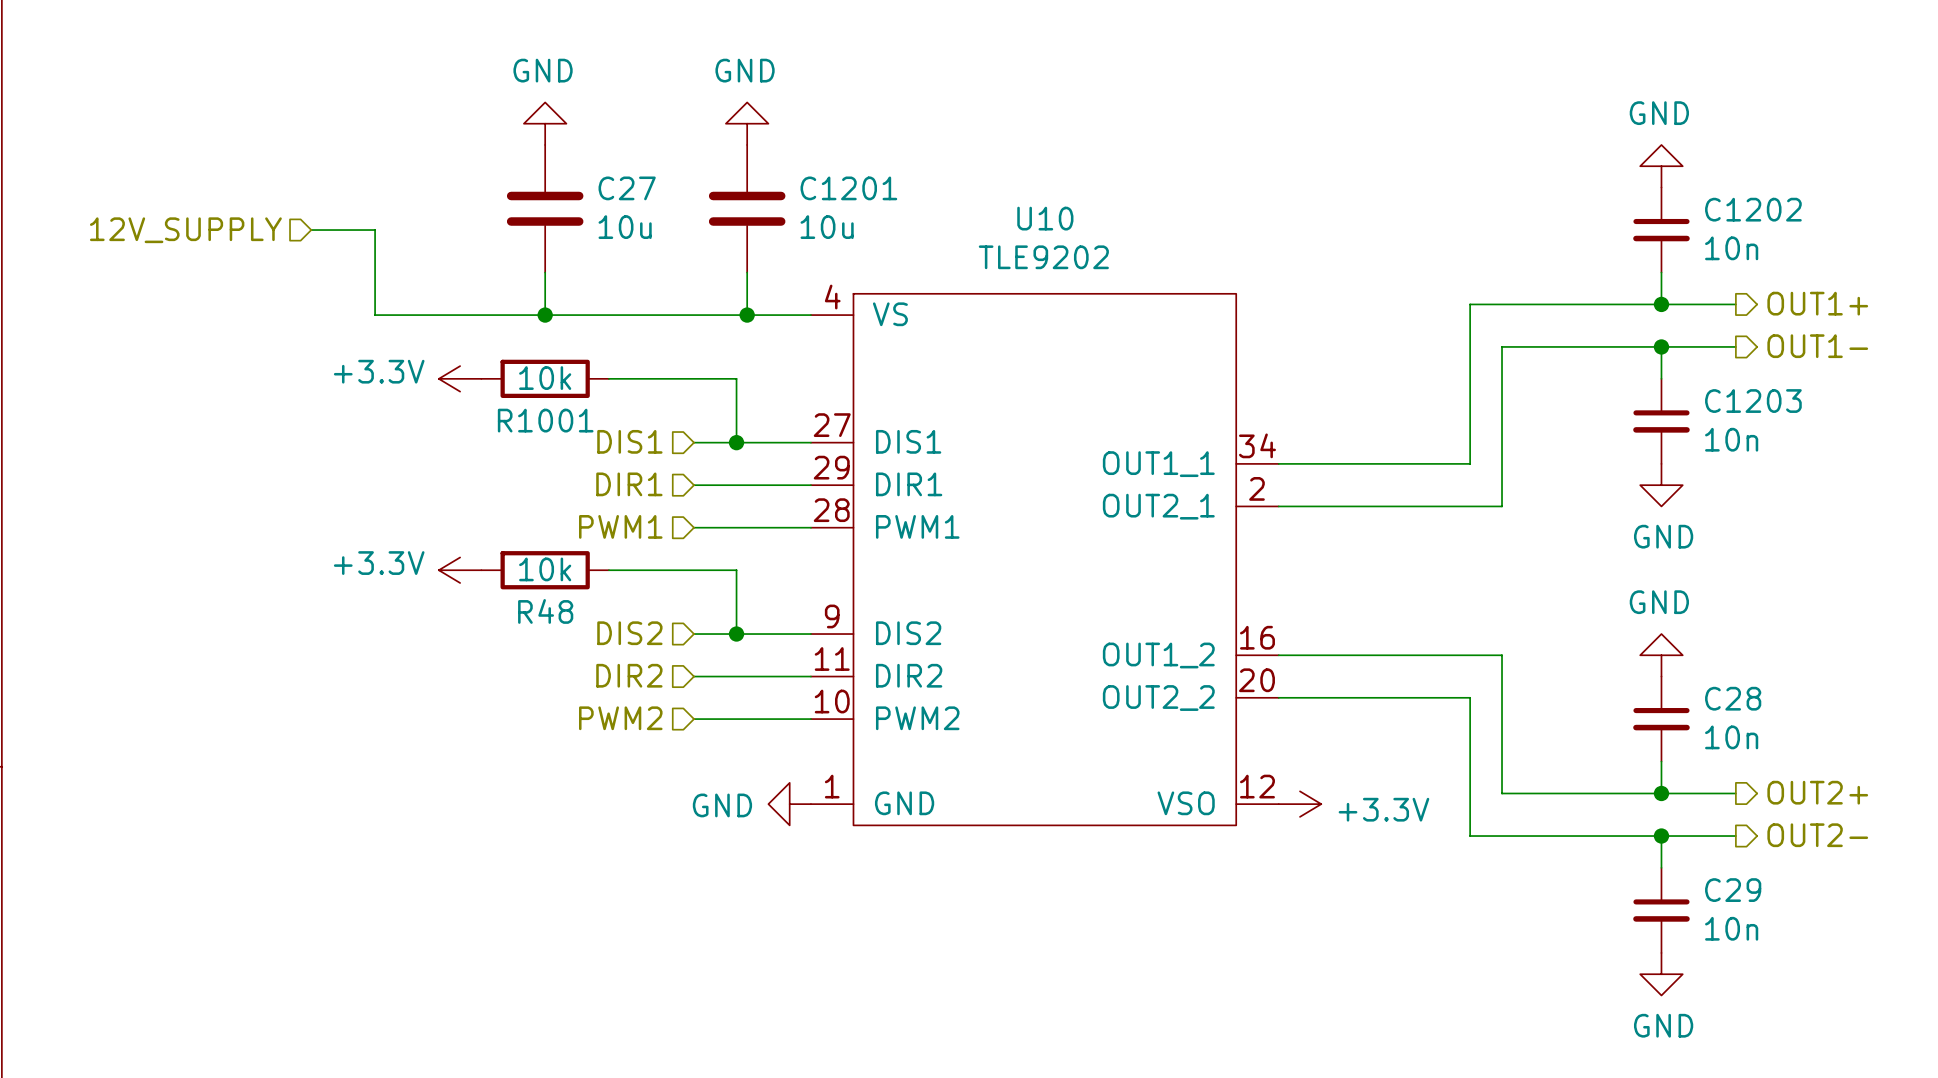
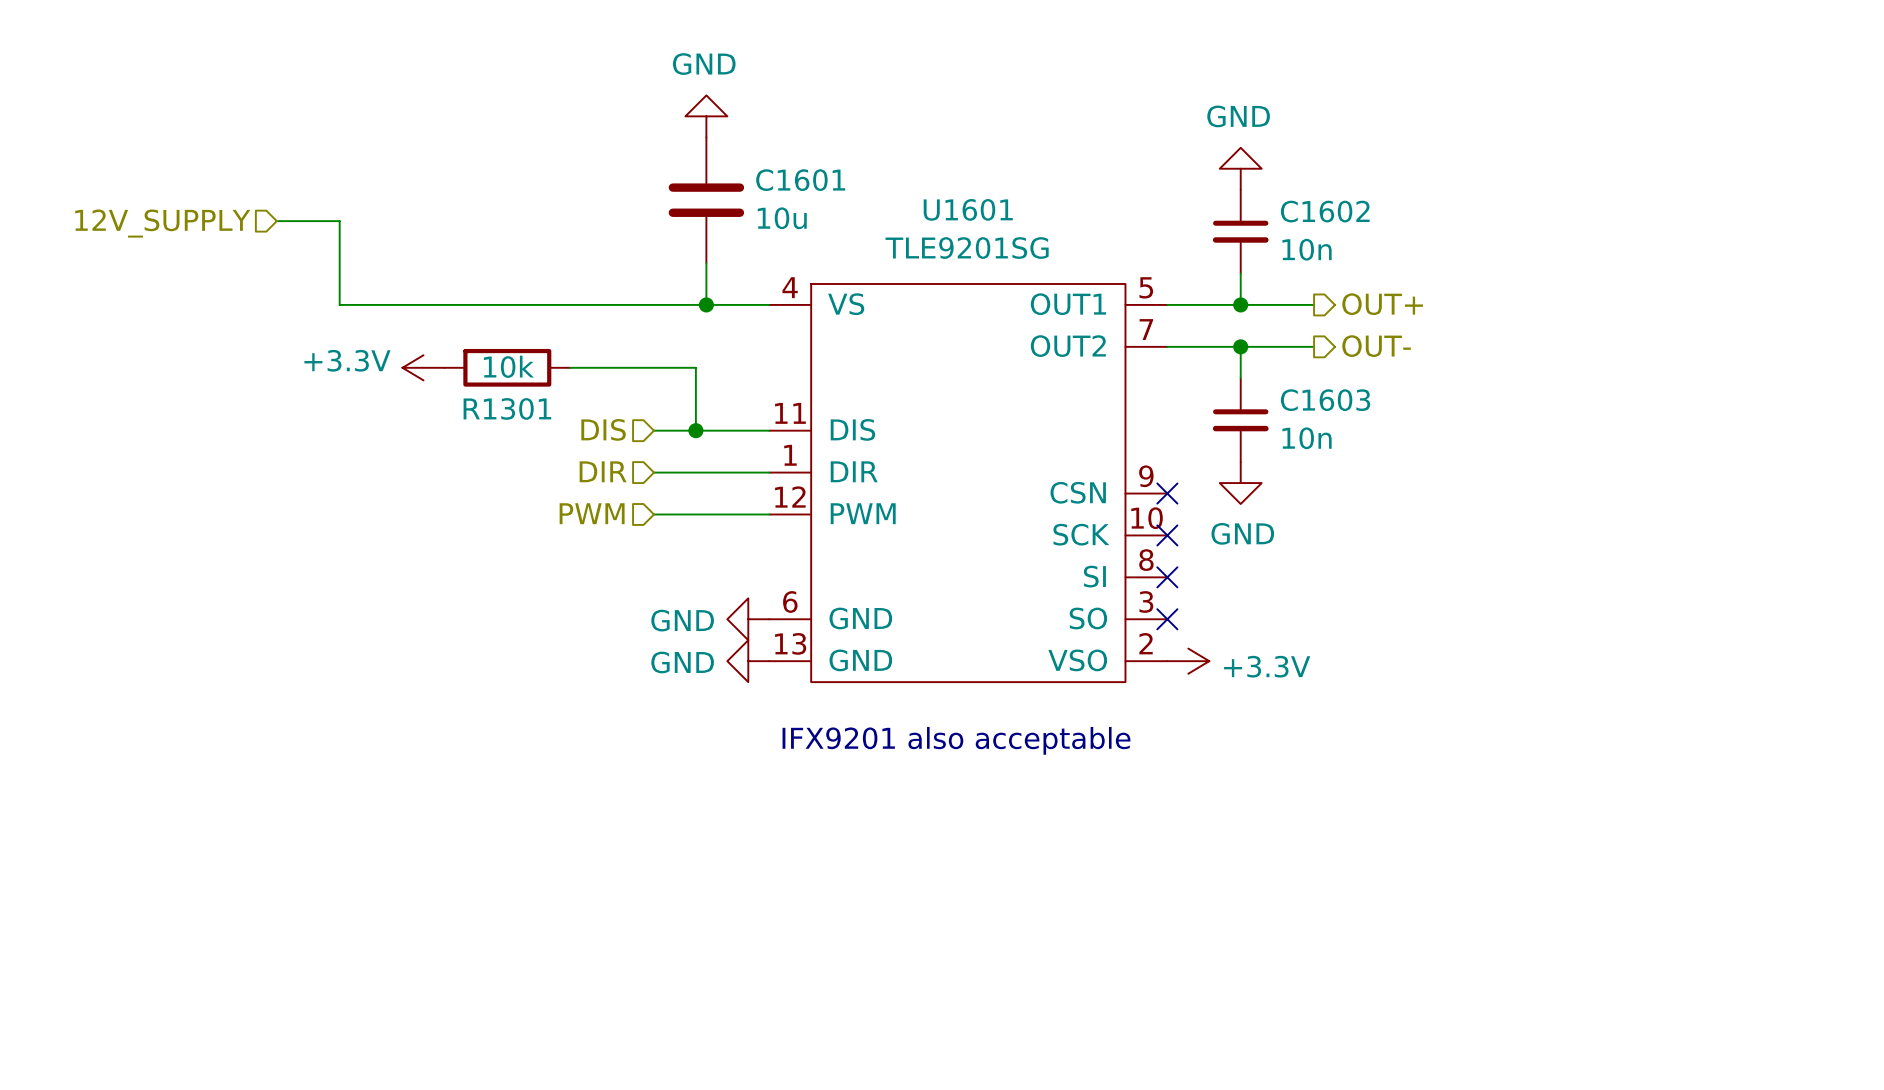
power symbol: GND (545, 123) -> none
power symbol: GND (1661, 166) -> none
power symbol: none -> GND (1240, 168)
C1201 name: C1201 (848, 188) -> C1601 (800, 180)
C27: 10u (545, 208) -> none
C1202: 10n (1661, 230) -> none
C1602: none -> 10n (1240, 231)
wire: (545, 272) (545, 315) -> none
wire: (1661, 272) (1661, 304) -> (1240, 273) (1240, 304)
hierarchical label: OUT1+ (1817, 303) -> none
junction: (1661, 304) -> none
wire: (1735, 304) (1470, 304) (1470, 463) (1278, 463) -> none
hierarchical label: none -> OUT+ (1382, 304)
junction: (545, 315) -> none
wire: none -> (1167, 304) (1314, 304)
junction: none -> (1240, 304)
wire: (1661, 346) (1661, 378) -> (1240, 346) (1240, 378)
junction: (1661, 346) -> none
wire: (1735, 346) (1502, 346) (1502, 506) (1278, 506) -> none
hierarchical label: OUT1- (1817, 346) -> none
hierarchical label: none -> OUT- (1376, 346)
wire: none -> (1167, 346) (1314, 346)
junction: none -> (1240, 346)
R1001 name: R1001 (545, 420) -> R1301 (507, 408)
C1203: 10n (1661, 421) -> none
C1603: none -> 10n (1240, 420)
hierarchical label: DIS1 (629, 441) -> DIS (603, 429)
hierarchical label: DIR1 (629, 484) -> DIR (603, 471)
power symbol: GND (1661, 485) -> none
U1601: none -> TLE9201SG (968, 483)
power symbol: none -> GND (1240, 483)
no-connect mark: none -> (1167, 493)
hierarchical label: PWM1 (620, 526) -> PWM (592, 513)
no-connect mark: none -> (1167, 535)
U10: TLE9202 (1044, 559) -> none
power symbol: +3.3V (460, 570) -> none
R48: 10k (545, 570) -> none
wire: (608, 570) (736, 570) (736, 634) -> none
no-connect mark: none -> (1167, 577)
hierarchical label: DIS2 (629, 633) -> none
wire: (694, 634) (810, 634) -> none
junction: (736, 634) -> none
power symbol: none -> GND (748, 619)
no-connect mark: none -> (1167, 619)
wire: (1278, 655) (1502, 655) (1502, 793) (1735, 793) -> none
power symbol: GND (1661, 655) -> none
hierarchical label: DIR2 (629, 675) -> none
wire: (694, 676) (810, 676) -> none
power symbol: none -> GND (748, 661)
wire: (1278, 697) (1470, 697) (1470, 836) (1735, 836) -> none
hierarchical label: PWM2 (620, 718) -> none
wire: (694, 719) (810, 719) -> none
C28: 10n (1661, 719) -> none
text: none -> IFX9201 also acceptable (956, 740)
wire: (1661, 761) (1661, 793) -> none
hierarchical label: OUT2+ (1817, 792) -> none
junction: (1661, 793) -> none
power symbol: GND (789, 804) -> none
power symbol position: +3.3V (1300, 804) -> +3.3V (1188, 661)
hierarchical label: OUT2- (1817, 835) -> none
wire: (1661, 836) (1661, 867) -> none
junction: (1661, 836) -> none
C29: 10n (1661, 910) -> none
power symbol: GND (1661, 974) -> none

